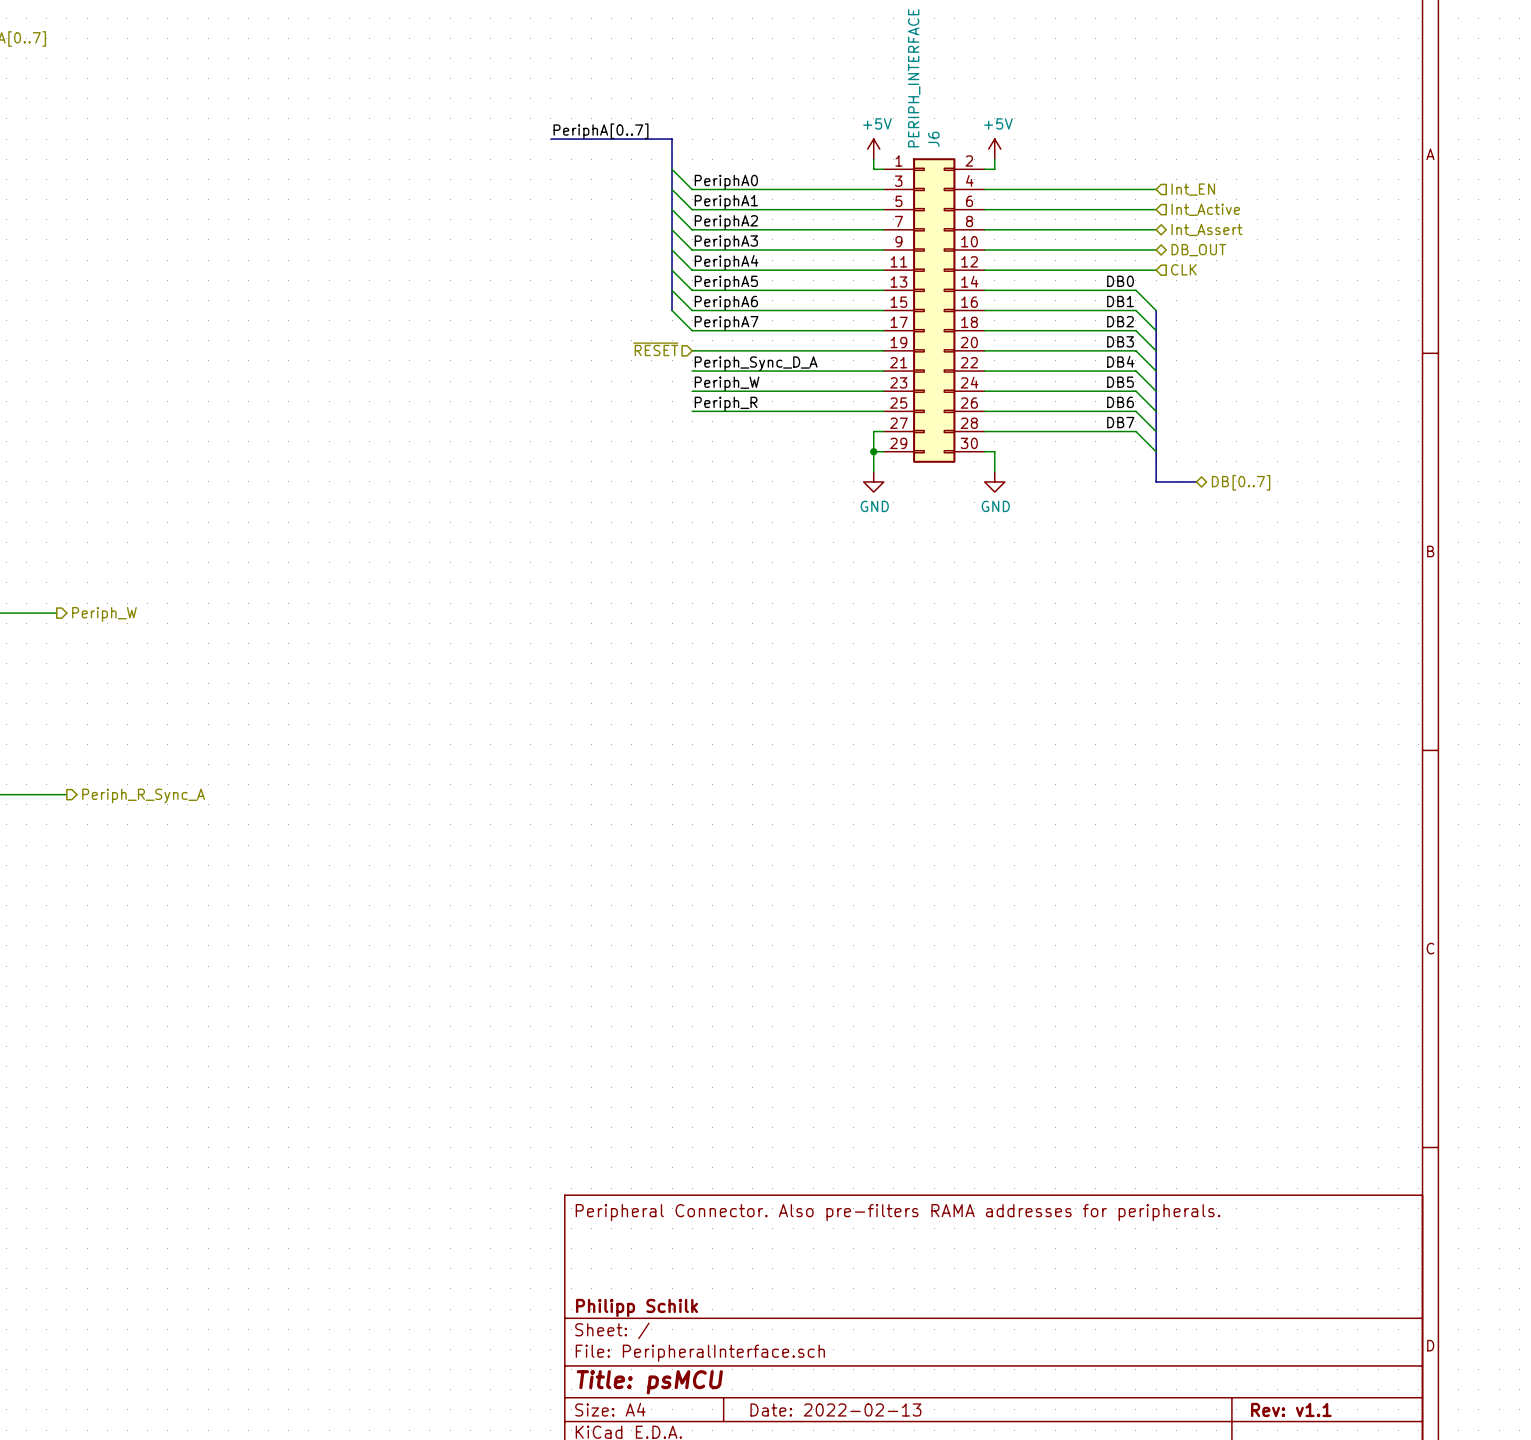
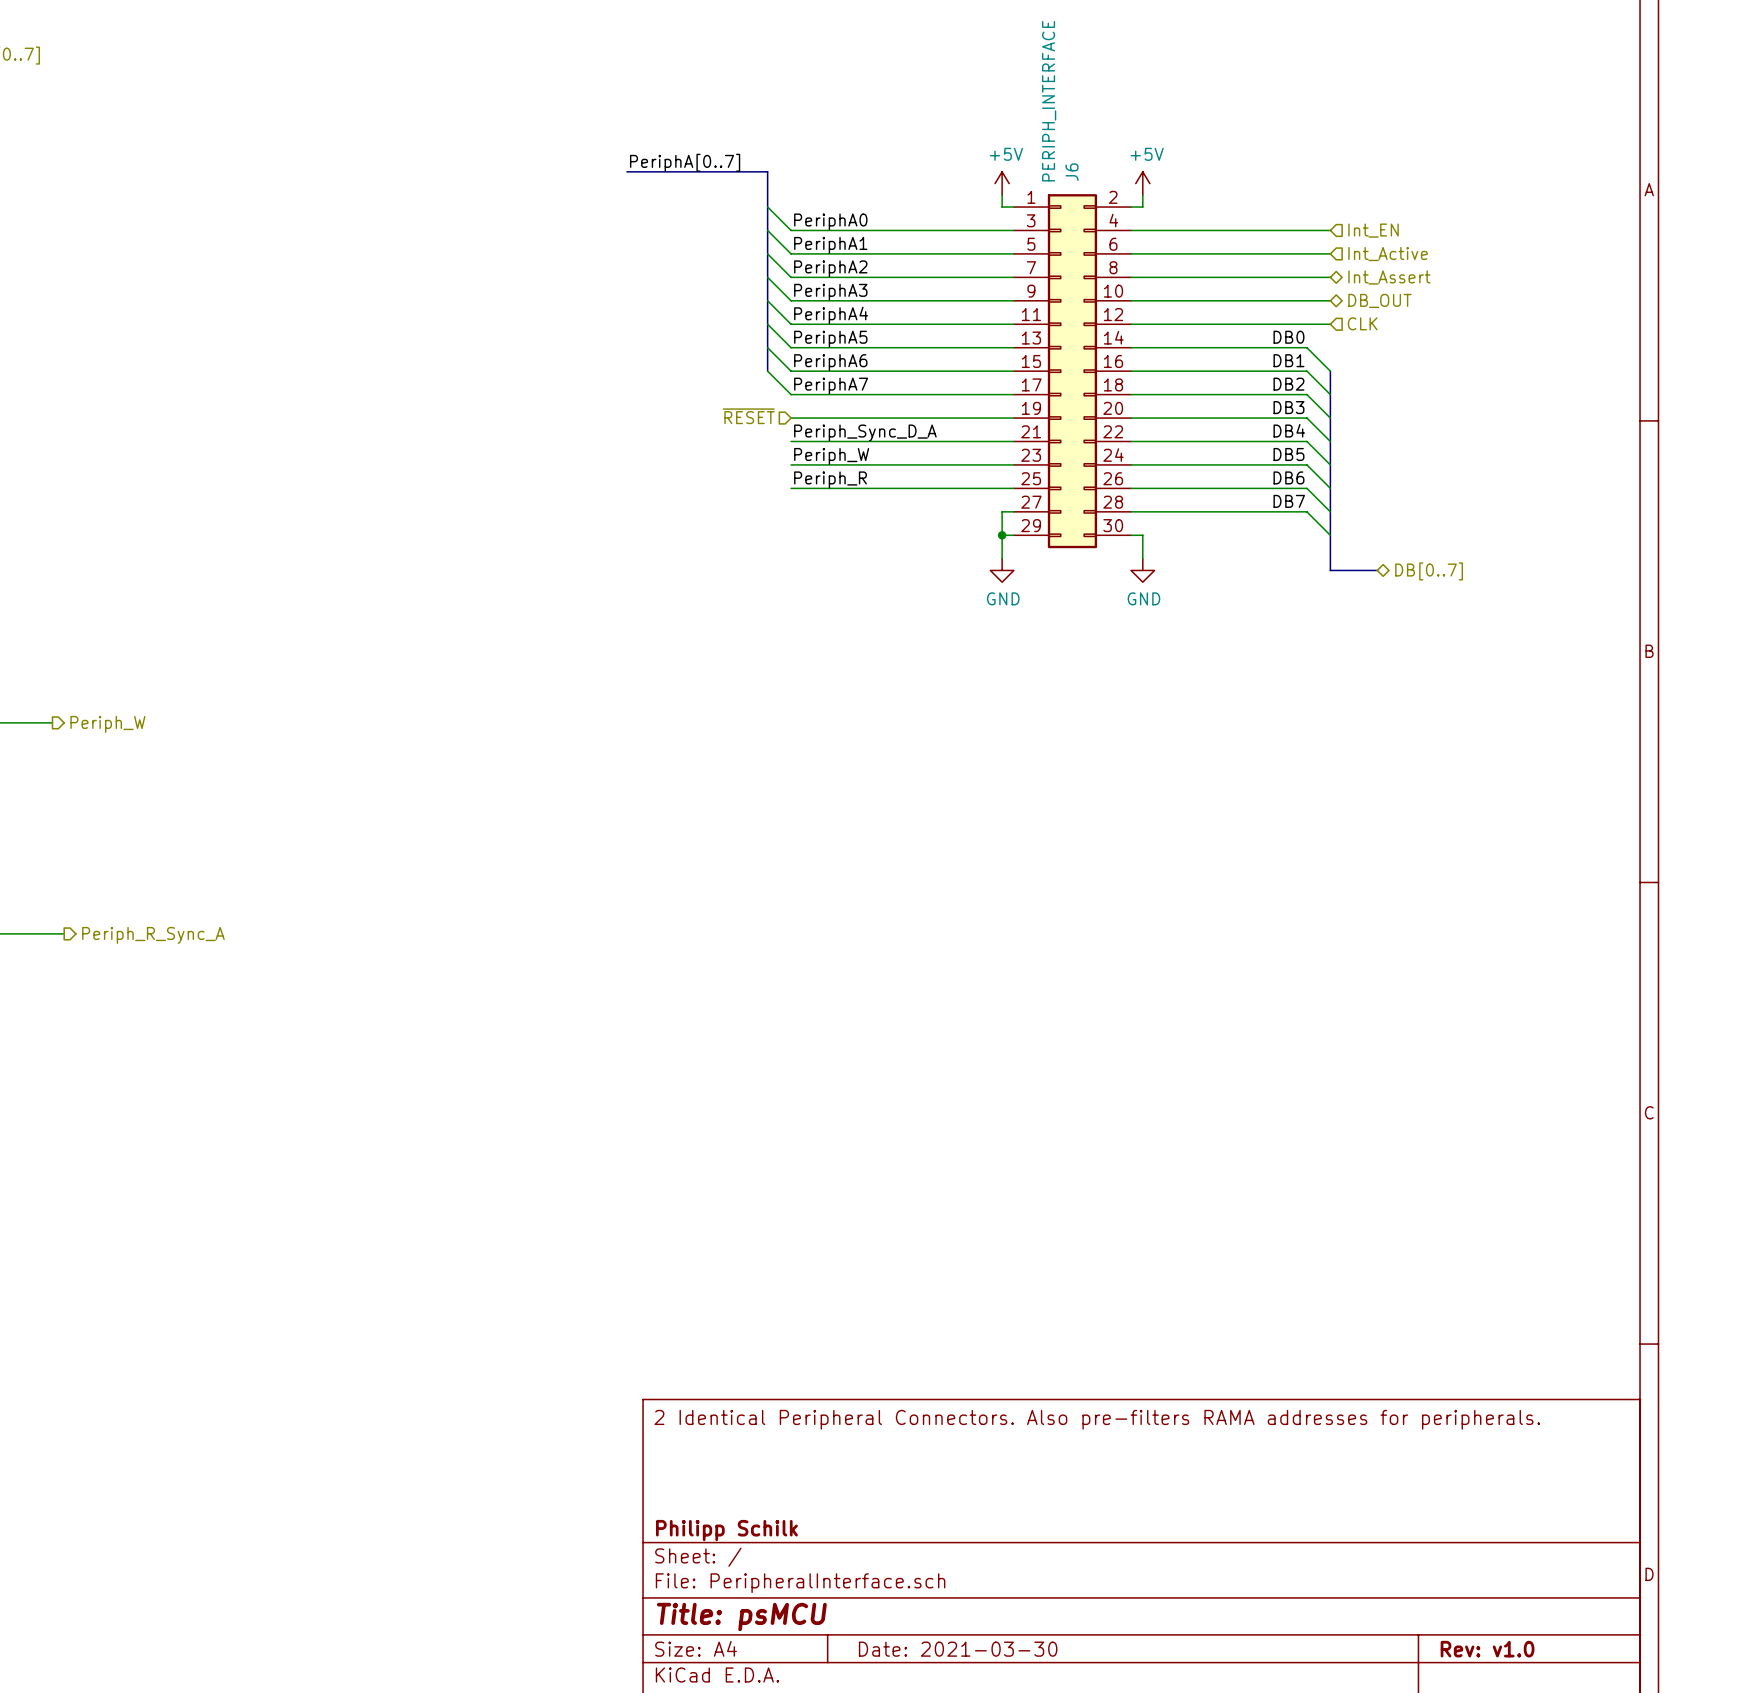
title block: Peripheral Connector. Also pre-filters RAMA addresses for peripherals. (898, 1212) -> 2 Identical Peripheral Connectors. Also pre-filters RAMA addresses for peripherals. (1097, 1419)
title block: Date: 2022-02-13 (835, 1409) -> Date: 2021-03-30 (958, 1649)
title block: Rev: v1.1 (1291, 1409) -> Rev: v1.0 (1487, 1649)

